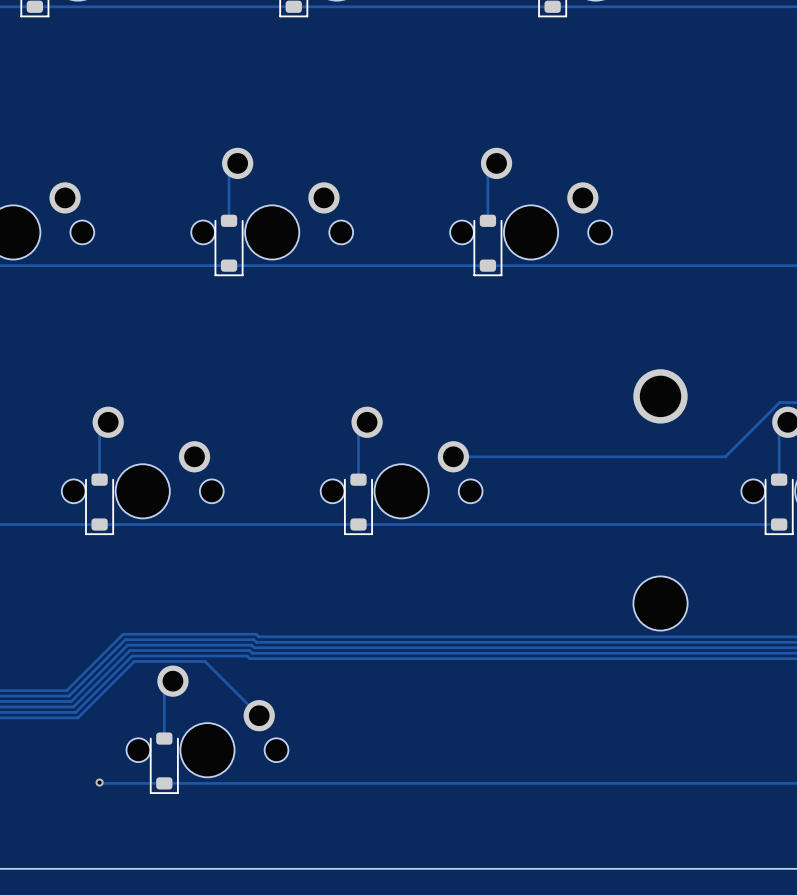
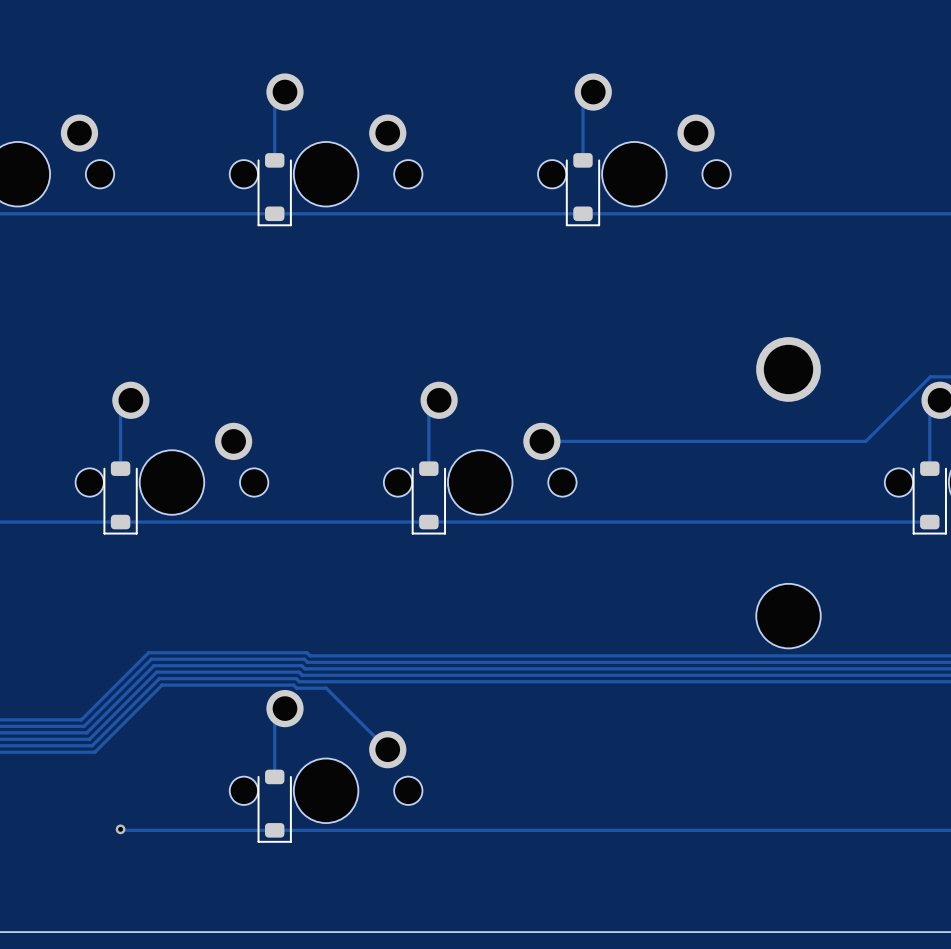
track: (205, 661) (259, 715) -> (246, 685) (293, 685) (296, 688) (326, 688) (387, 749)
track: (164, 689) (164, 738) -> (274, 718) (274, 776)
part position: (207, 721) -> (326, 756)
part position: (164, 763) -> (274, 806)

